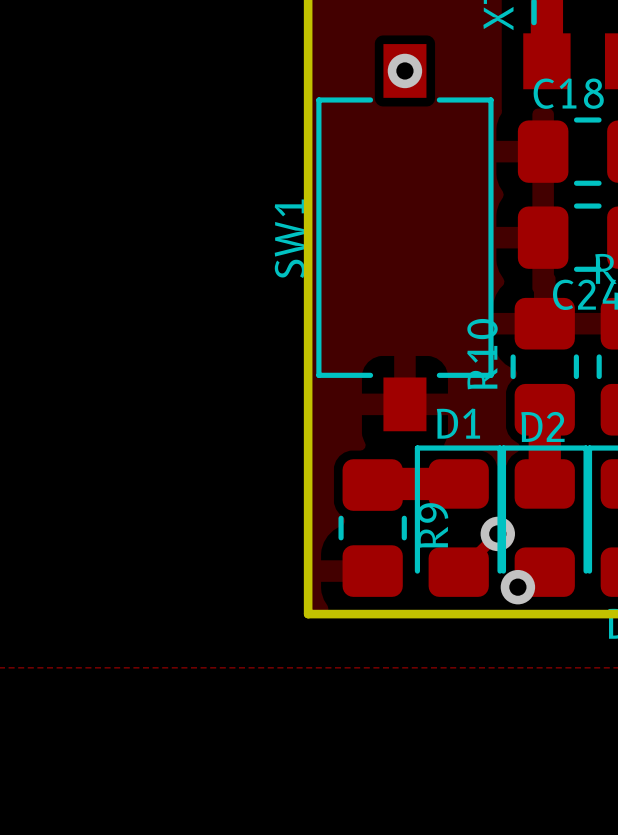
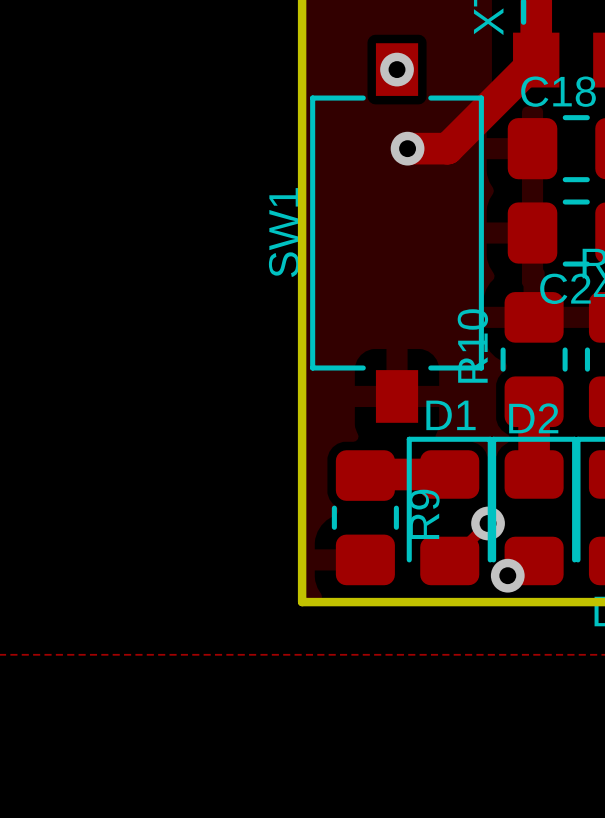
track: none -> (536, 60) (447, 148) (407, 148)
via: none -> (407, 148)

